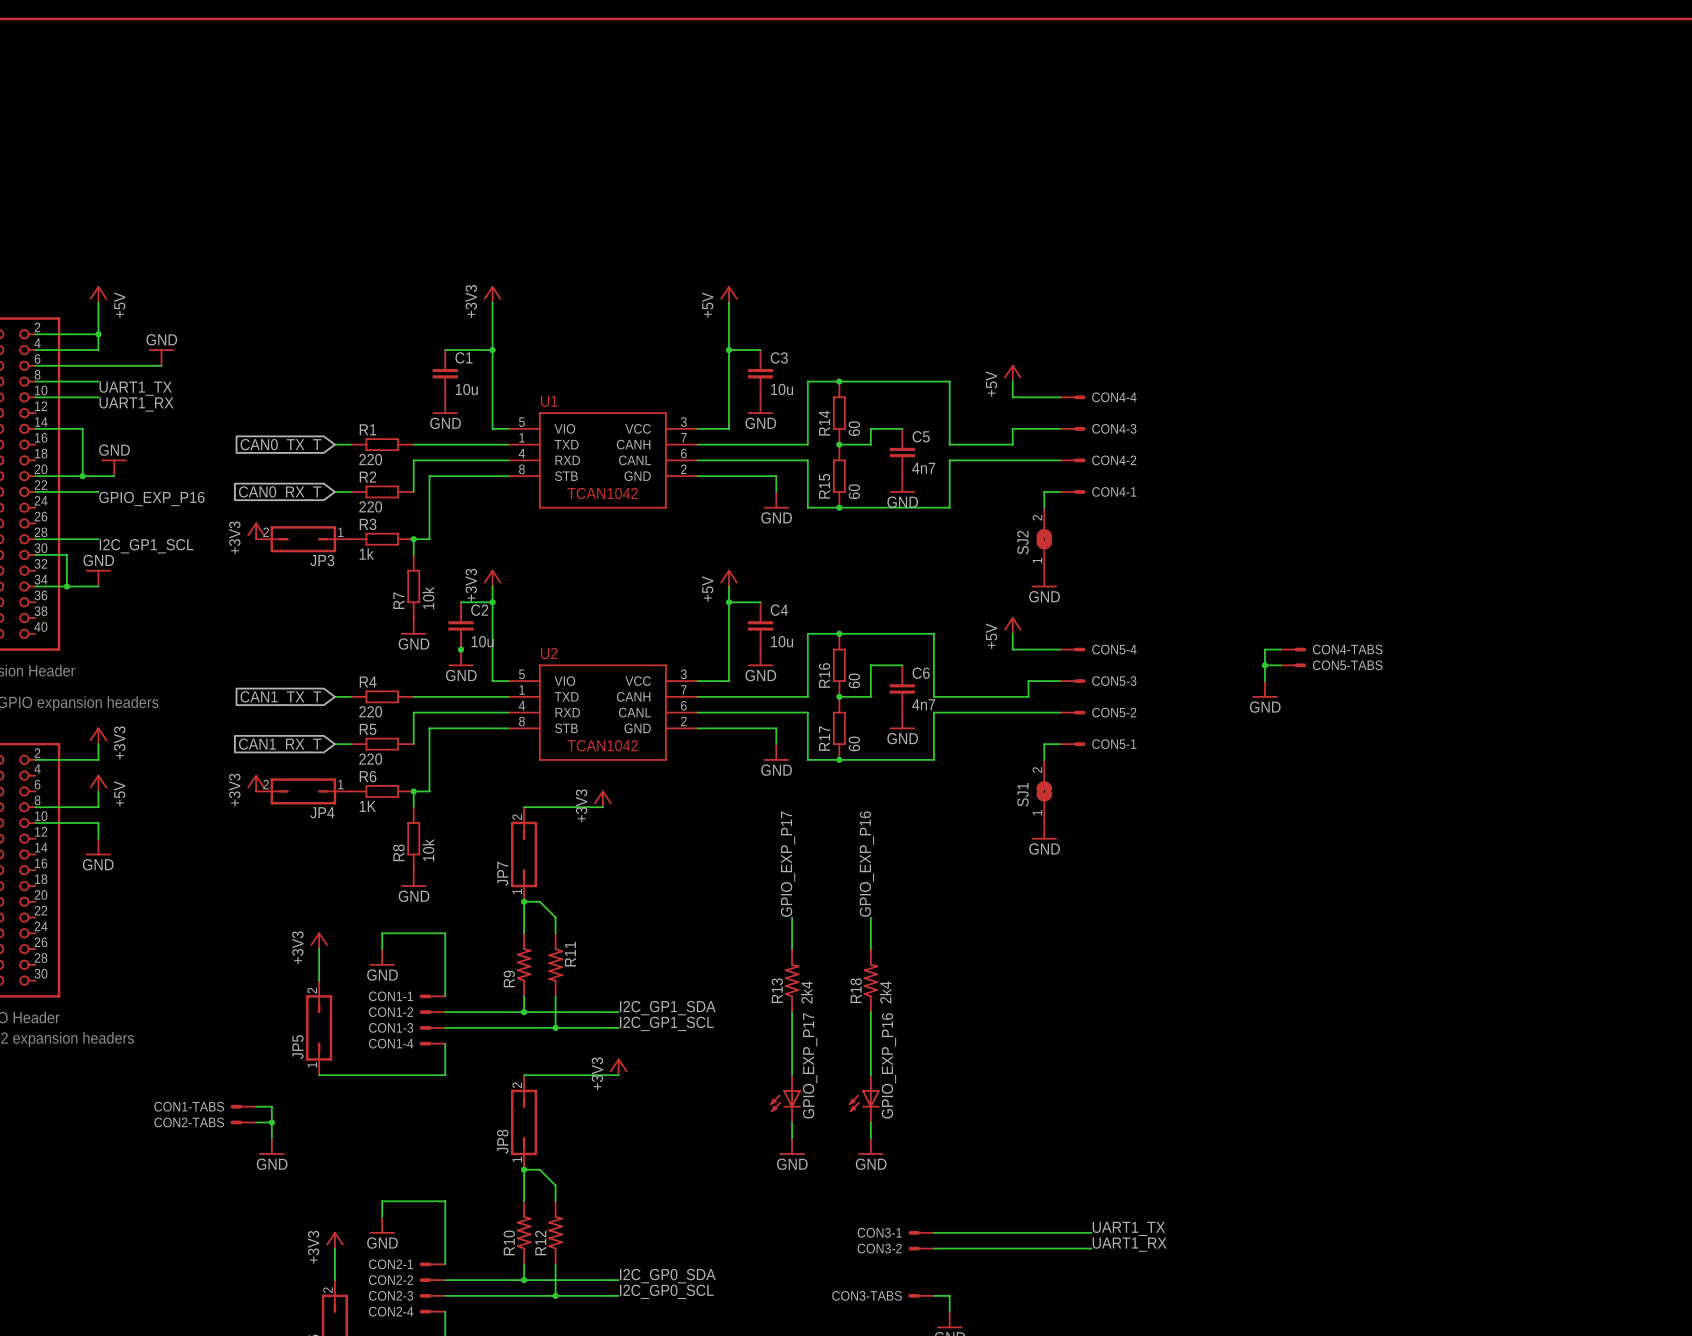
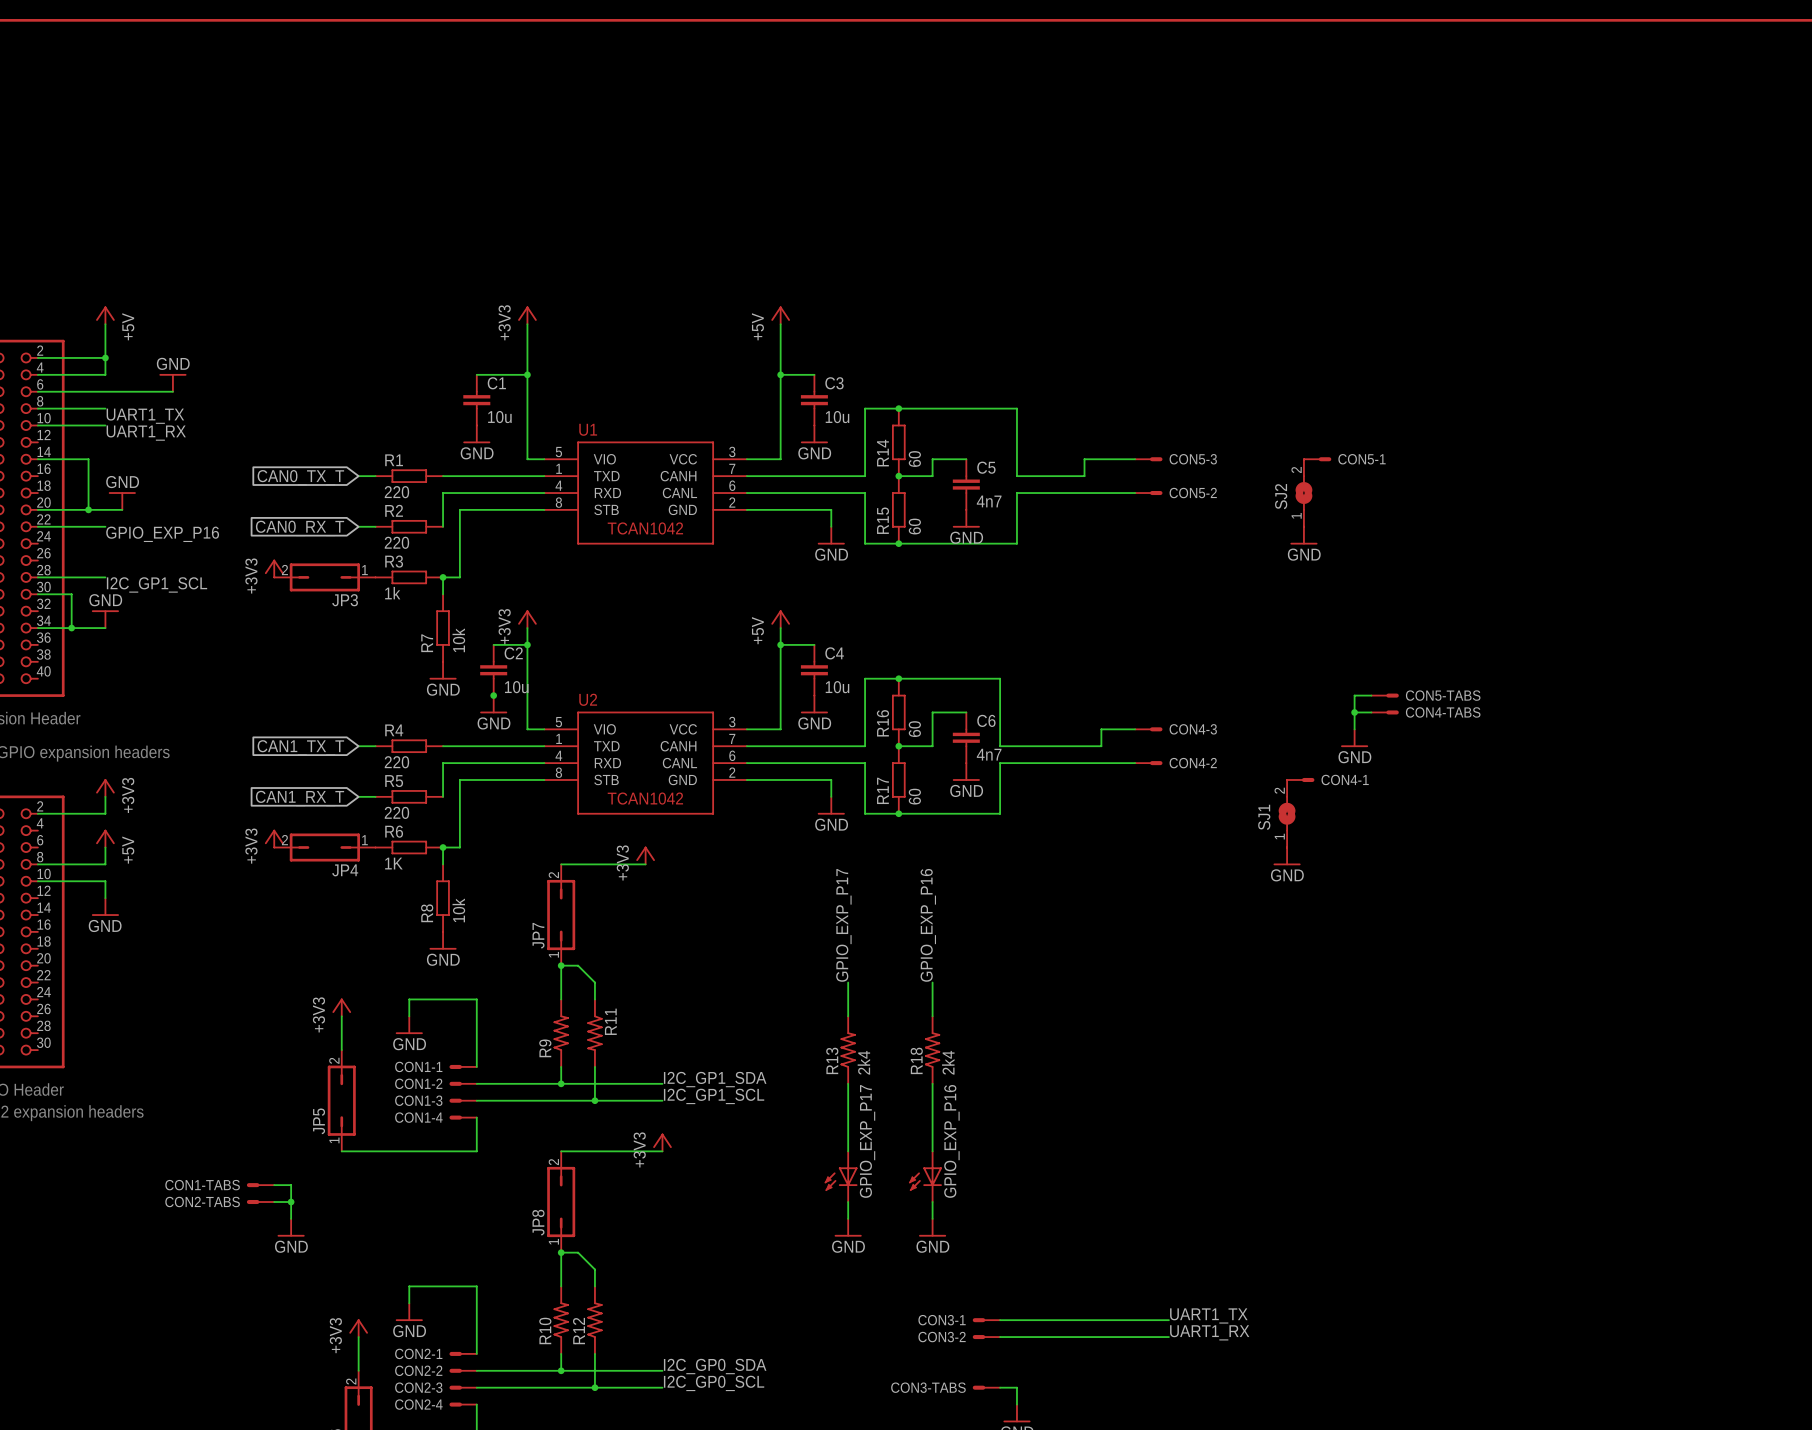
power symbol: +5V (1012, 373) -> none
wire: (1012, 381) (1012, 397) (1060, 397) -> none
CON4-4: (1072, 397) -> none
CON4-3 name: CON4-3 (1114, 428) -> CON5-3 (1193, 459)
CON4-2 name: CON4-2 (1114, 460) -> CON5-2 (1193, 493)
wire: (1060, 491) (1044, 491) (1044, 507) -> none
CON4-1 position: (1072, 491) -> (1300, 779)
power symbol: none -> GND (1303, 535)
SJ2 position: (1044, 539) -> (1303, 493)
power symbol: GND (1044, 579) -> none
power symbol: +5V (1012, 625) -> none
wire: (1012, 633) (1012, 649) (1060, 649) -> none
CON5-4: (1072, 649) -> none
CON4-TABS name: CON4-TABS (1347, 649) -> CON5-TABS (1443, 695)
CON5-TABS name: CON5-TABS (1347, 665) -> CON4-TABS (1443, 712)
CON5-3 name: CON5-3 (1114, 681) -> CON4-3 (1193, 729)
CON5-2 name: CON5-2 (1114, 712) -> CON4-2 (1193, 763)
wire: (1060, 744) (1044, 744) (1044, 759) -> none
CON5-1 position: (1072, 744) -> (1317, 459)
SJ1 position: (1044, 791) -> (1287, 813)
power symbol: none -> GND (1287, 856)
power symbol: GND (1044, 831) -> none

